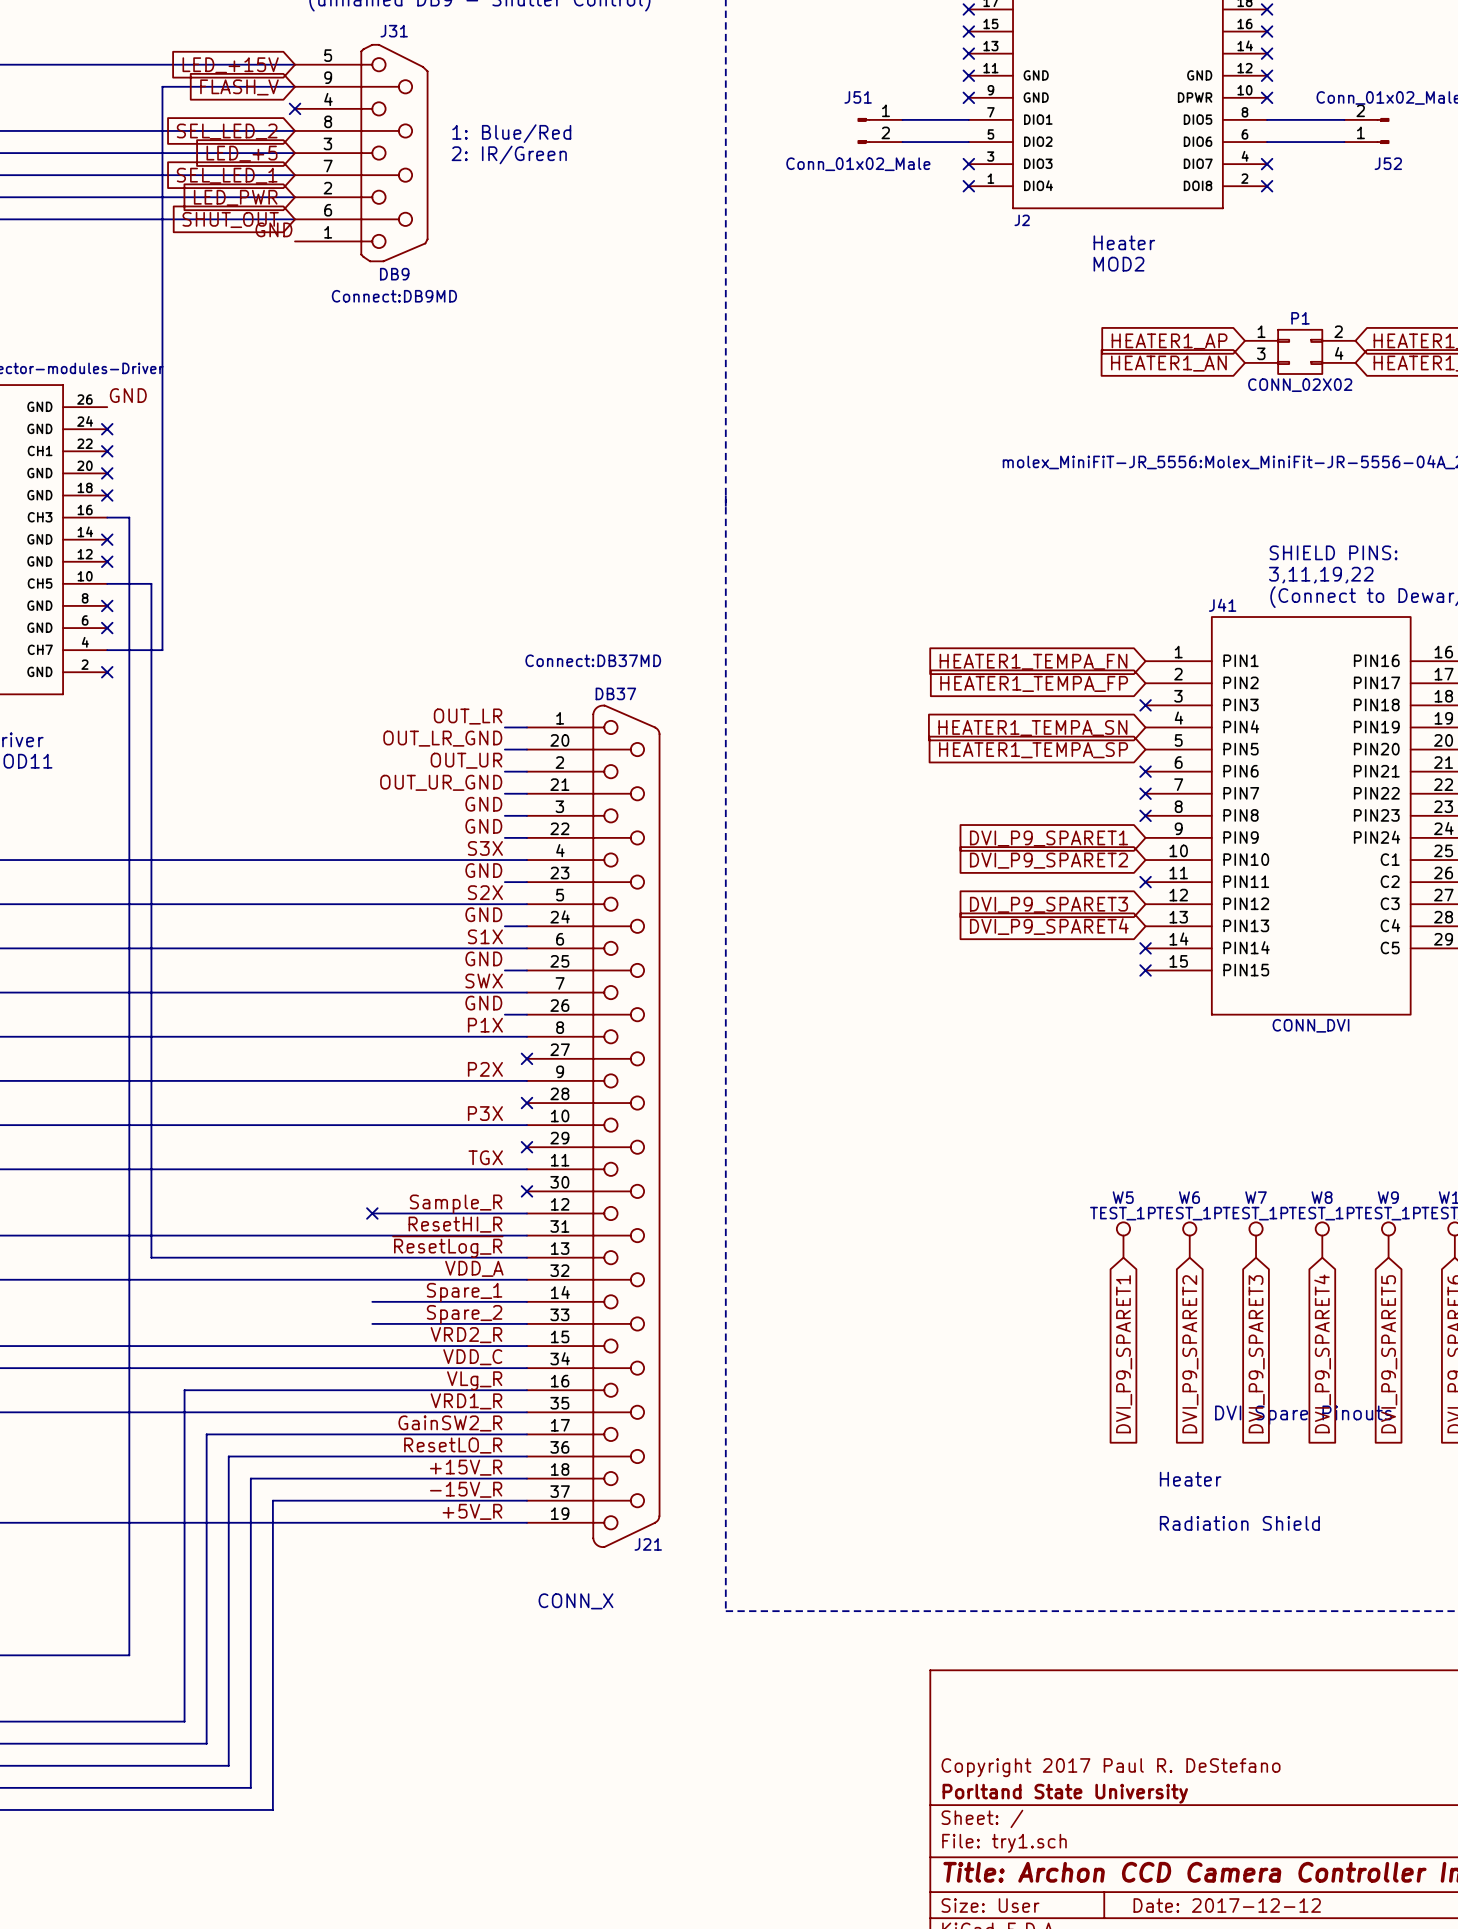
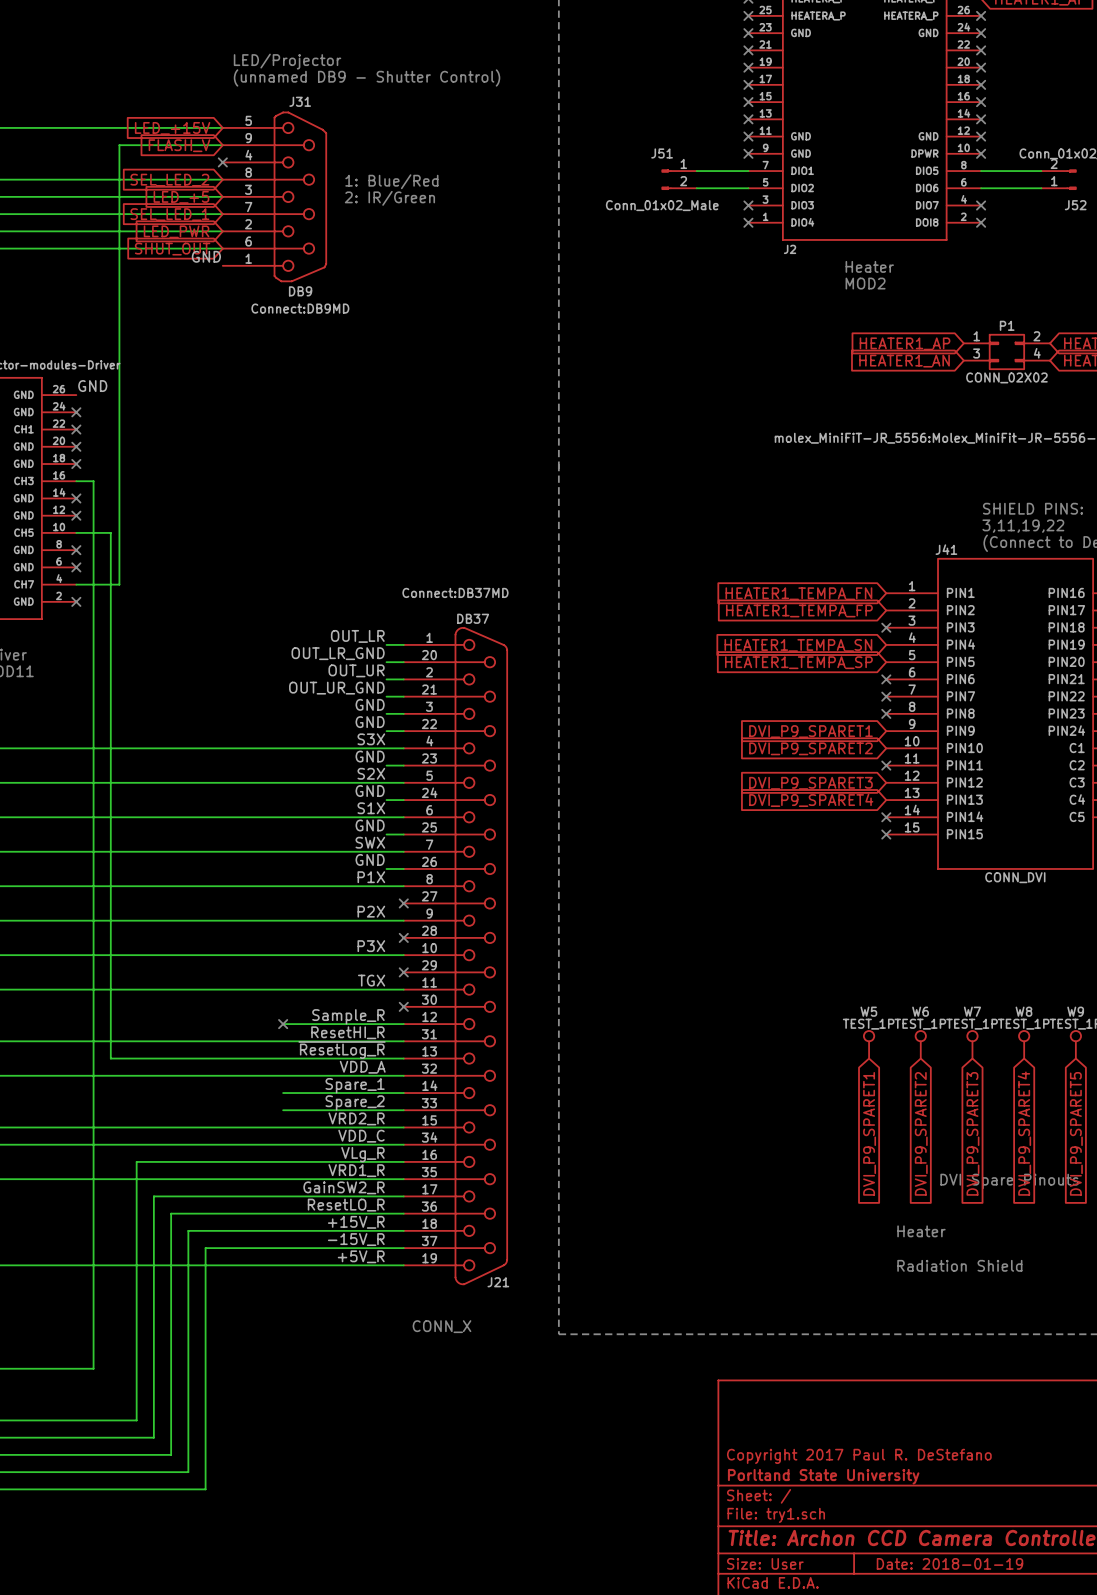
title block: Date: 2017-12-12 (1227, 1905) -> Date: 2018-01-19 (949, 1563)

